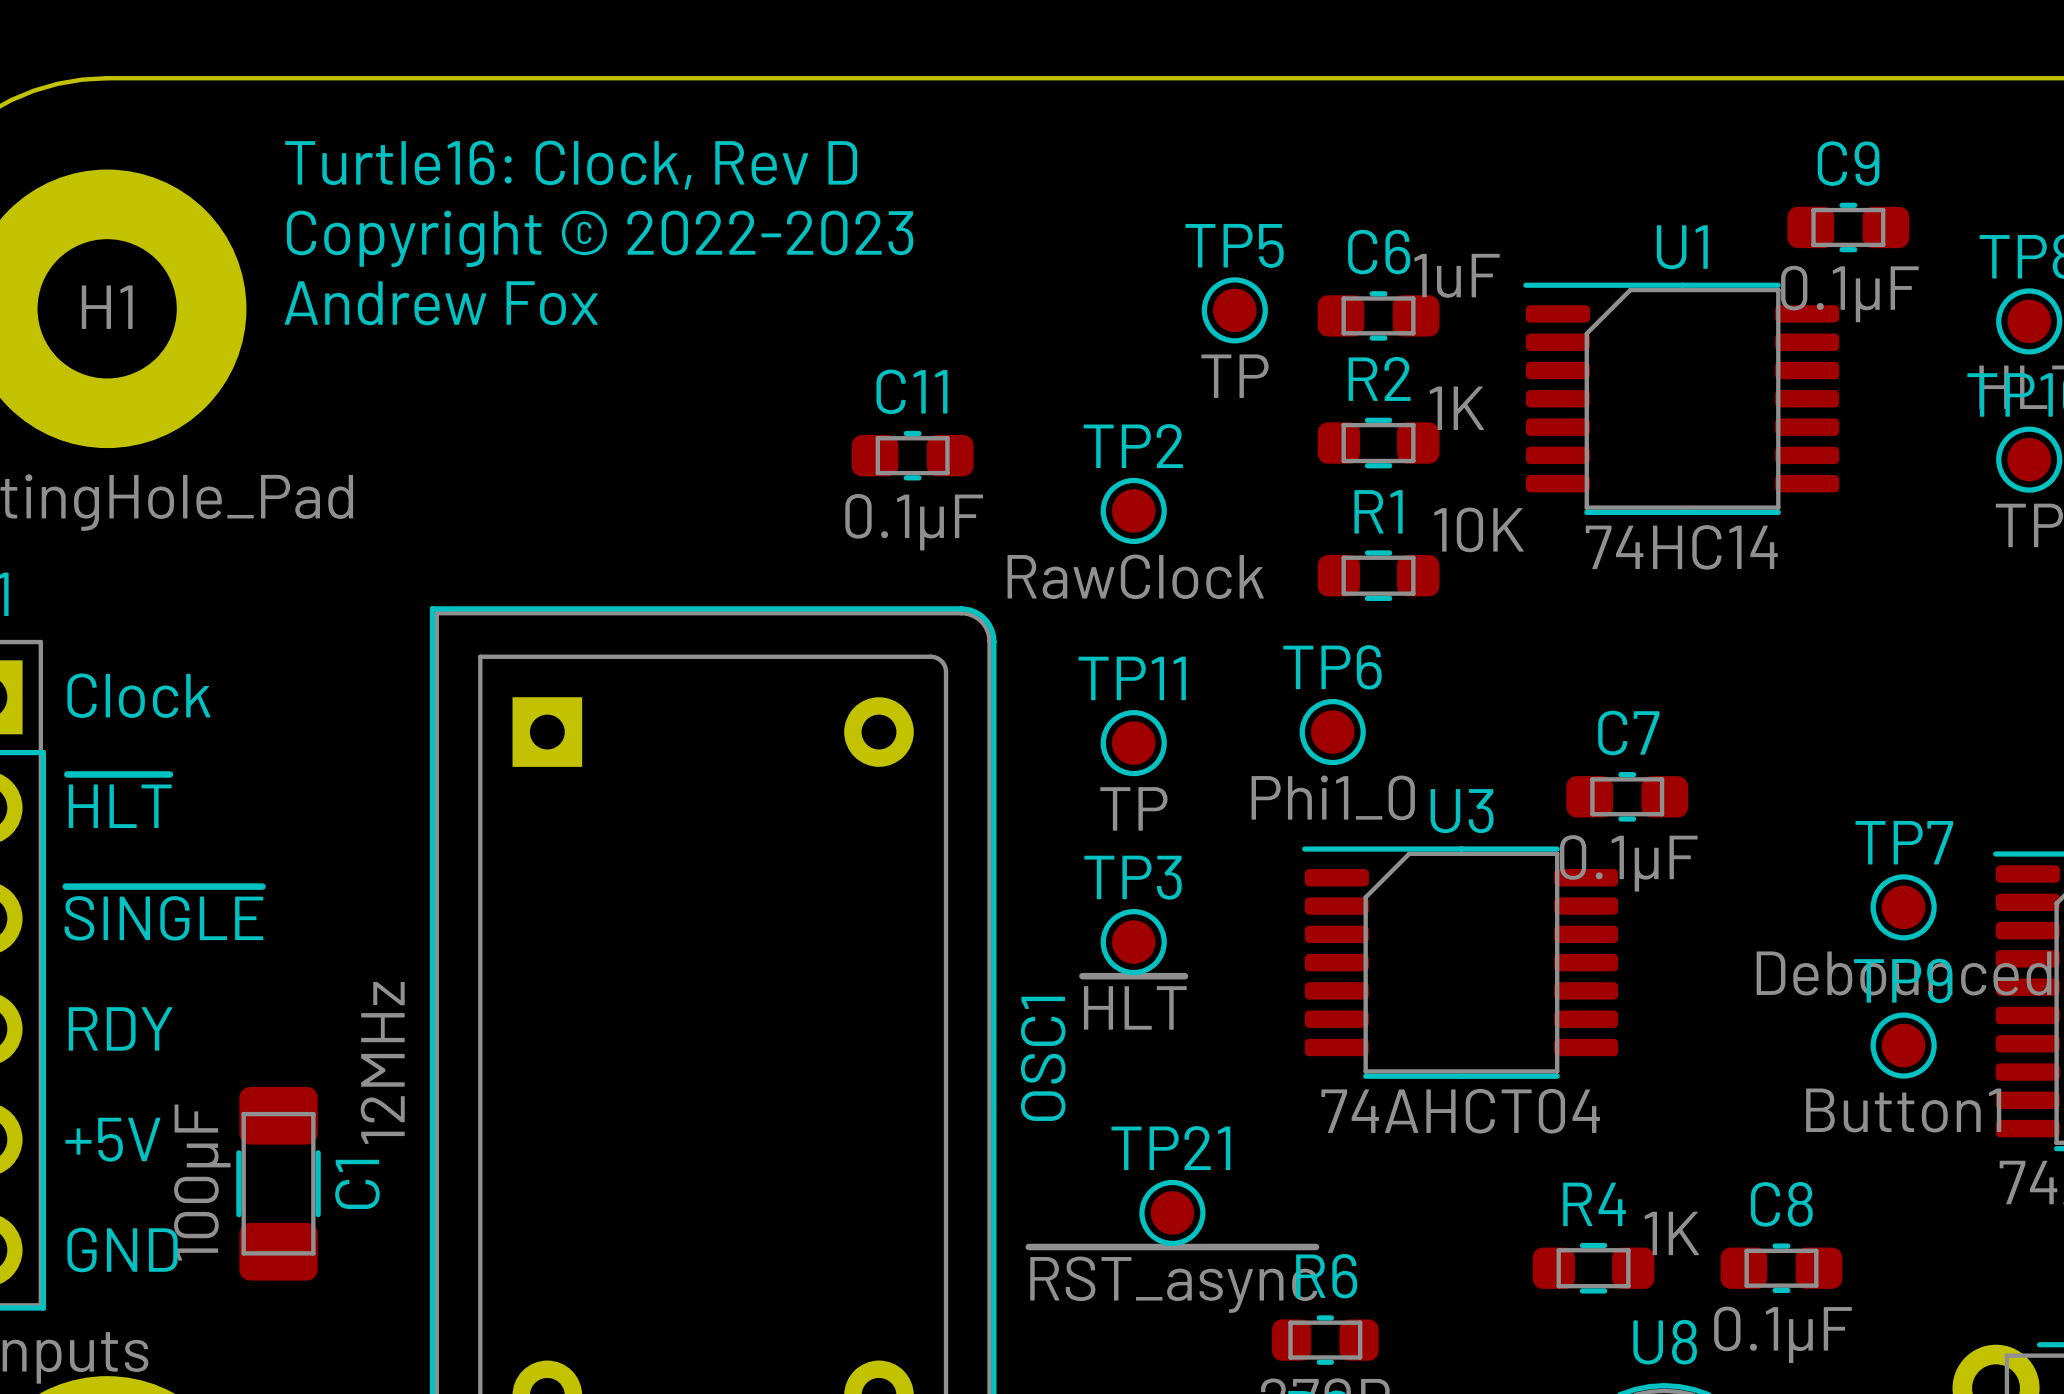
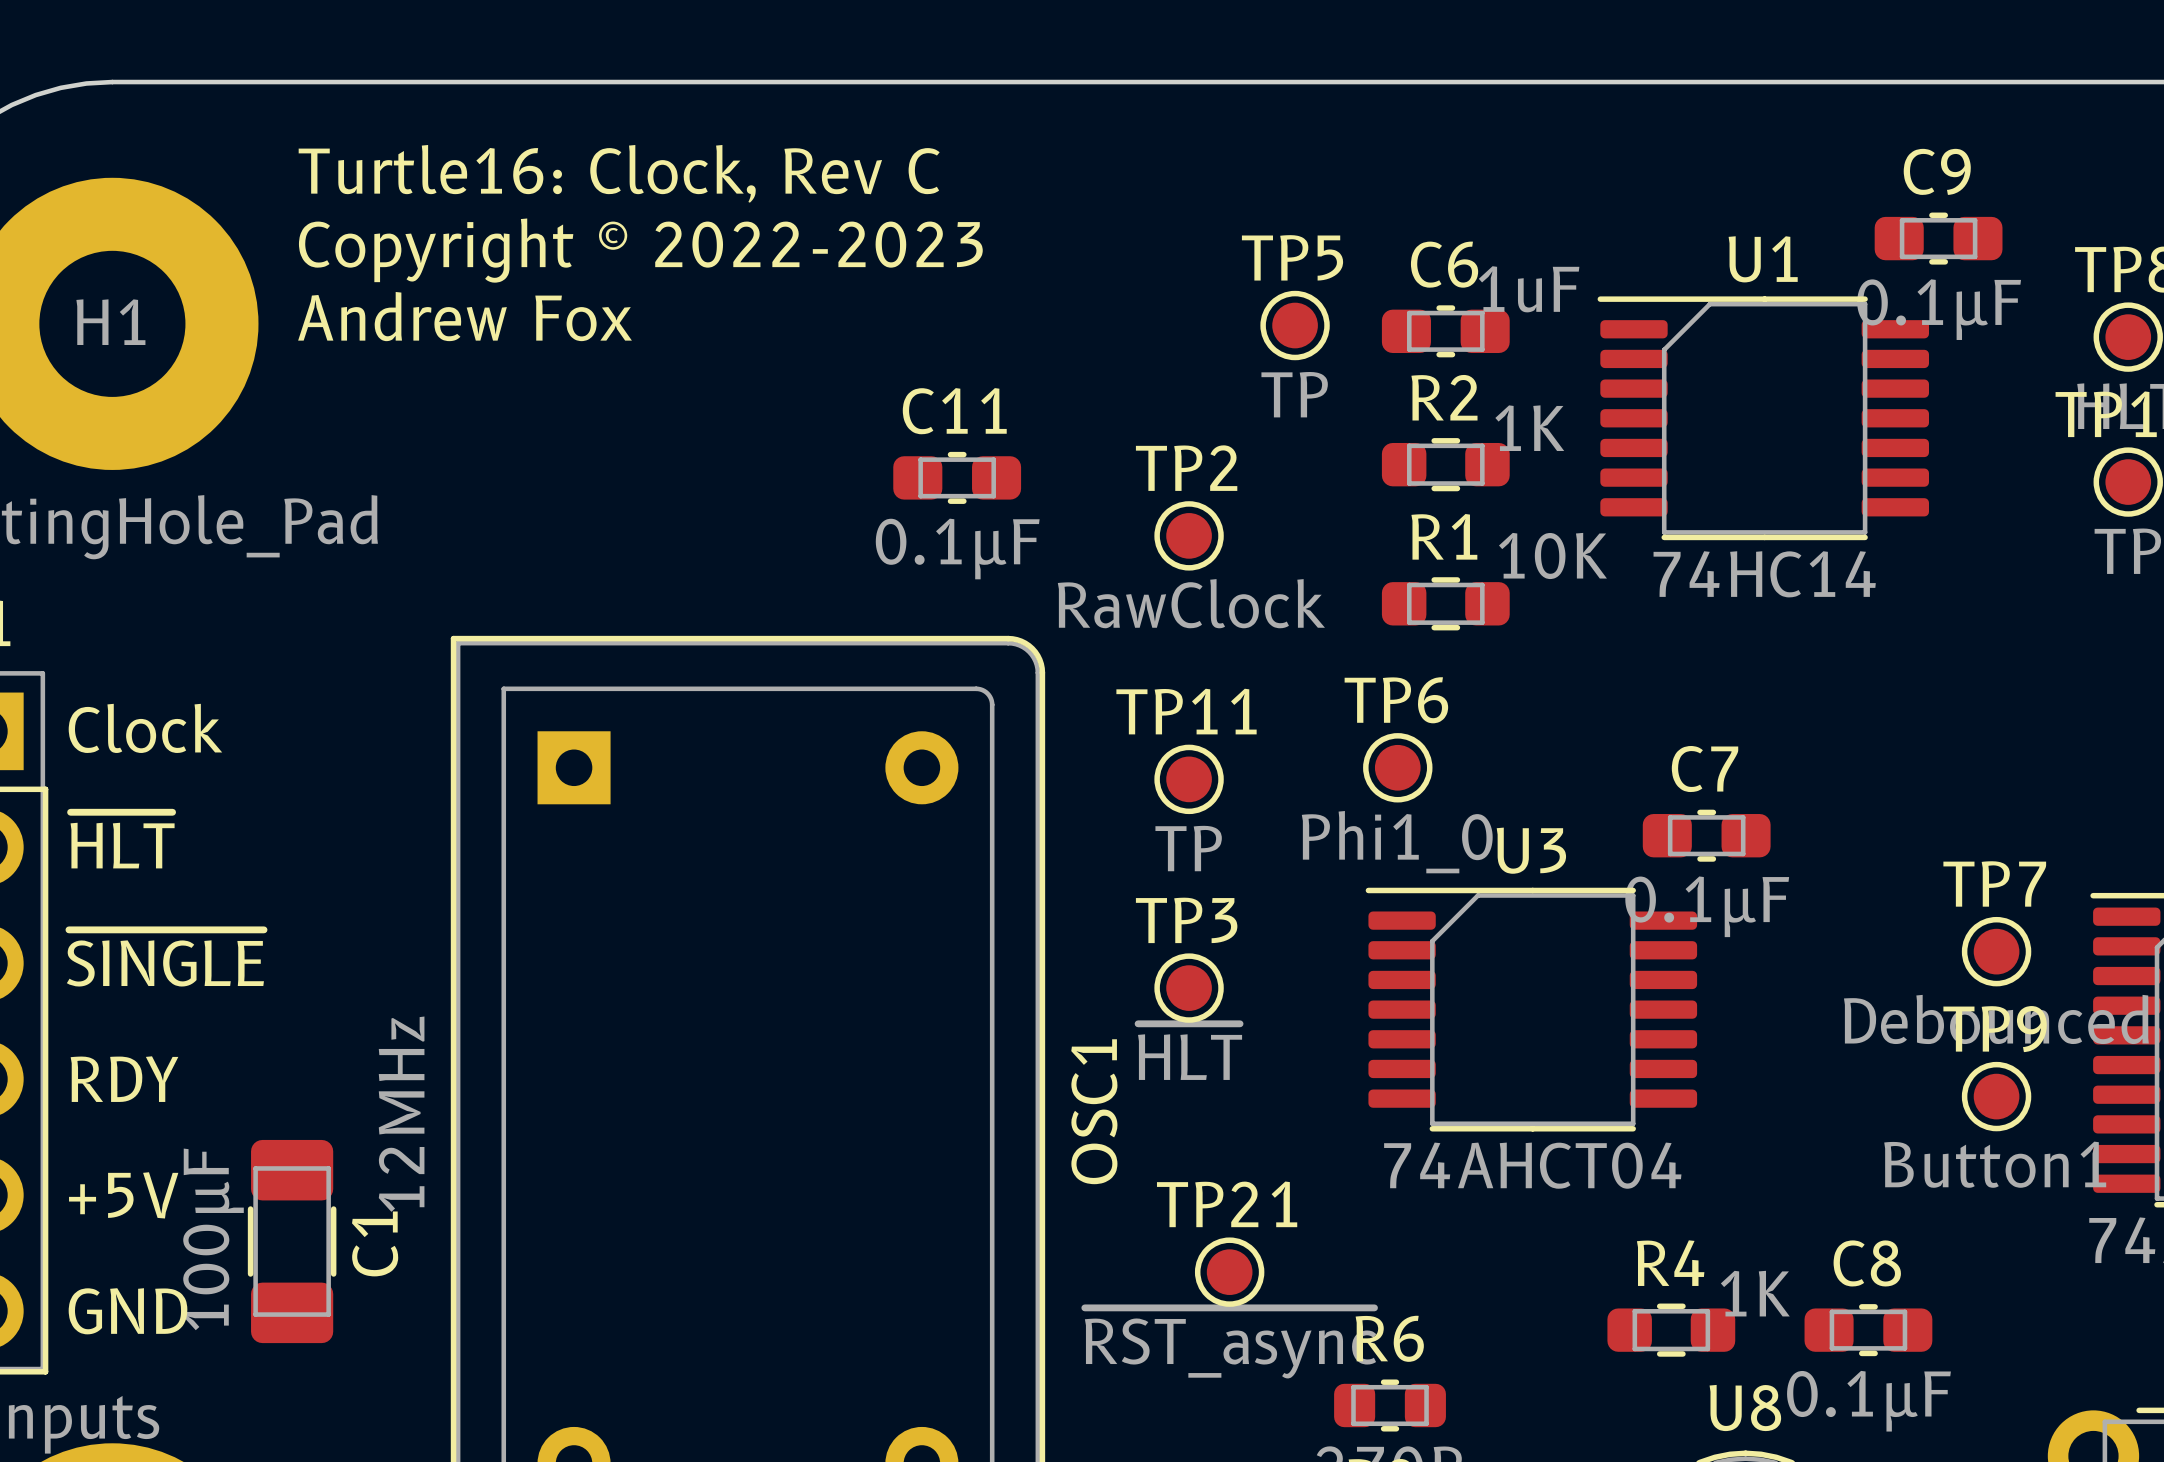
text: Turtle16: Clock, Rev D (571, 165) -> Turtle16: Clock, Rev C (619, 173)

